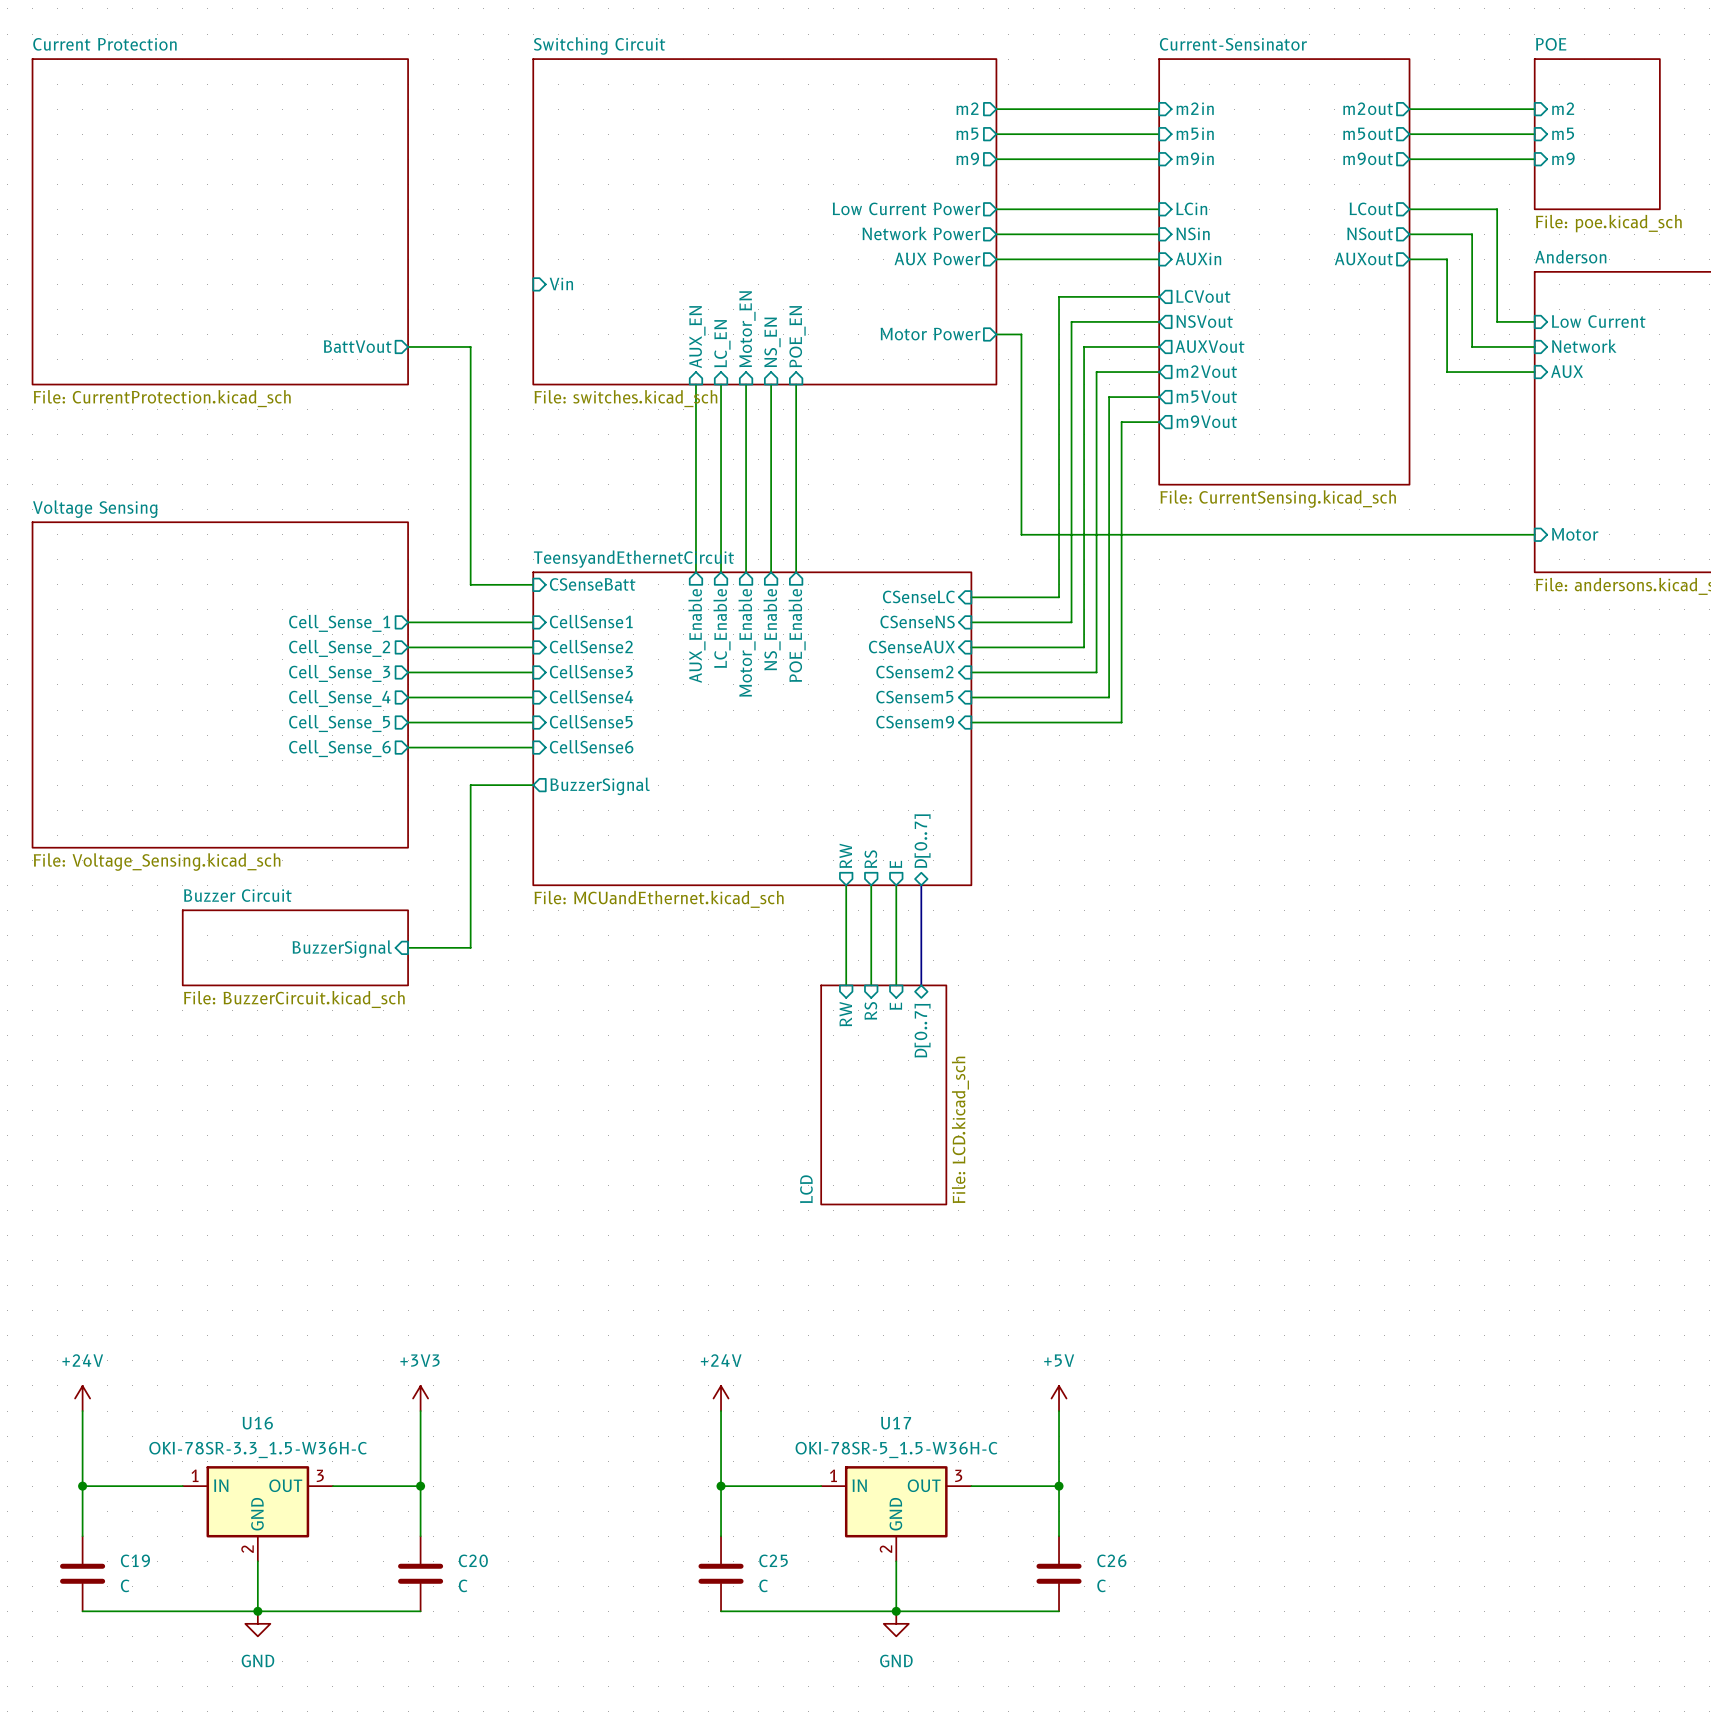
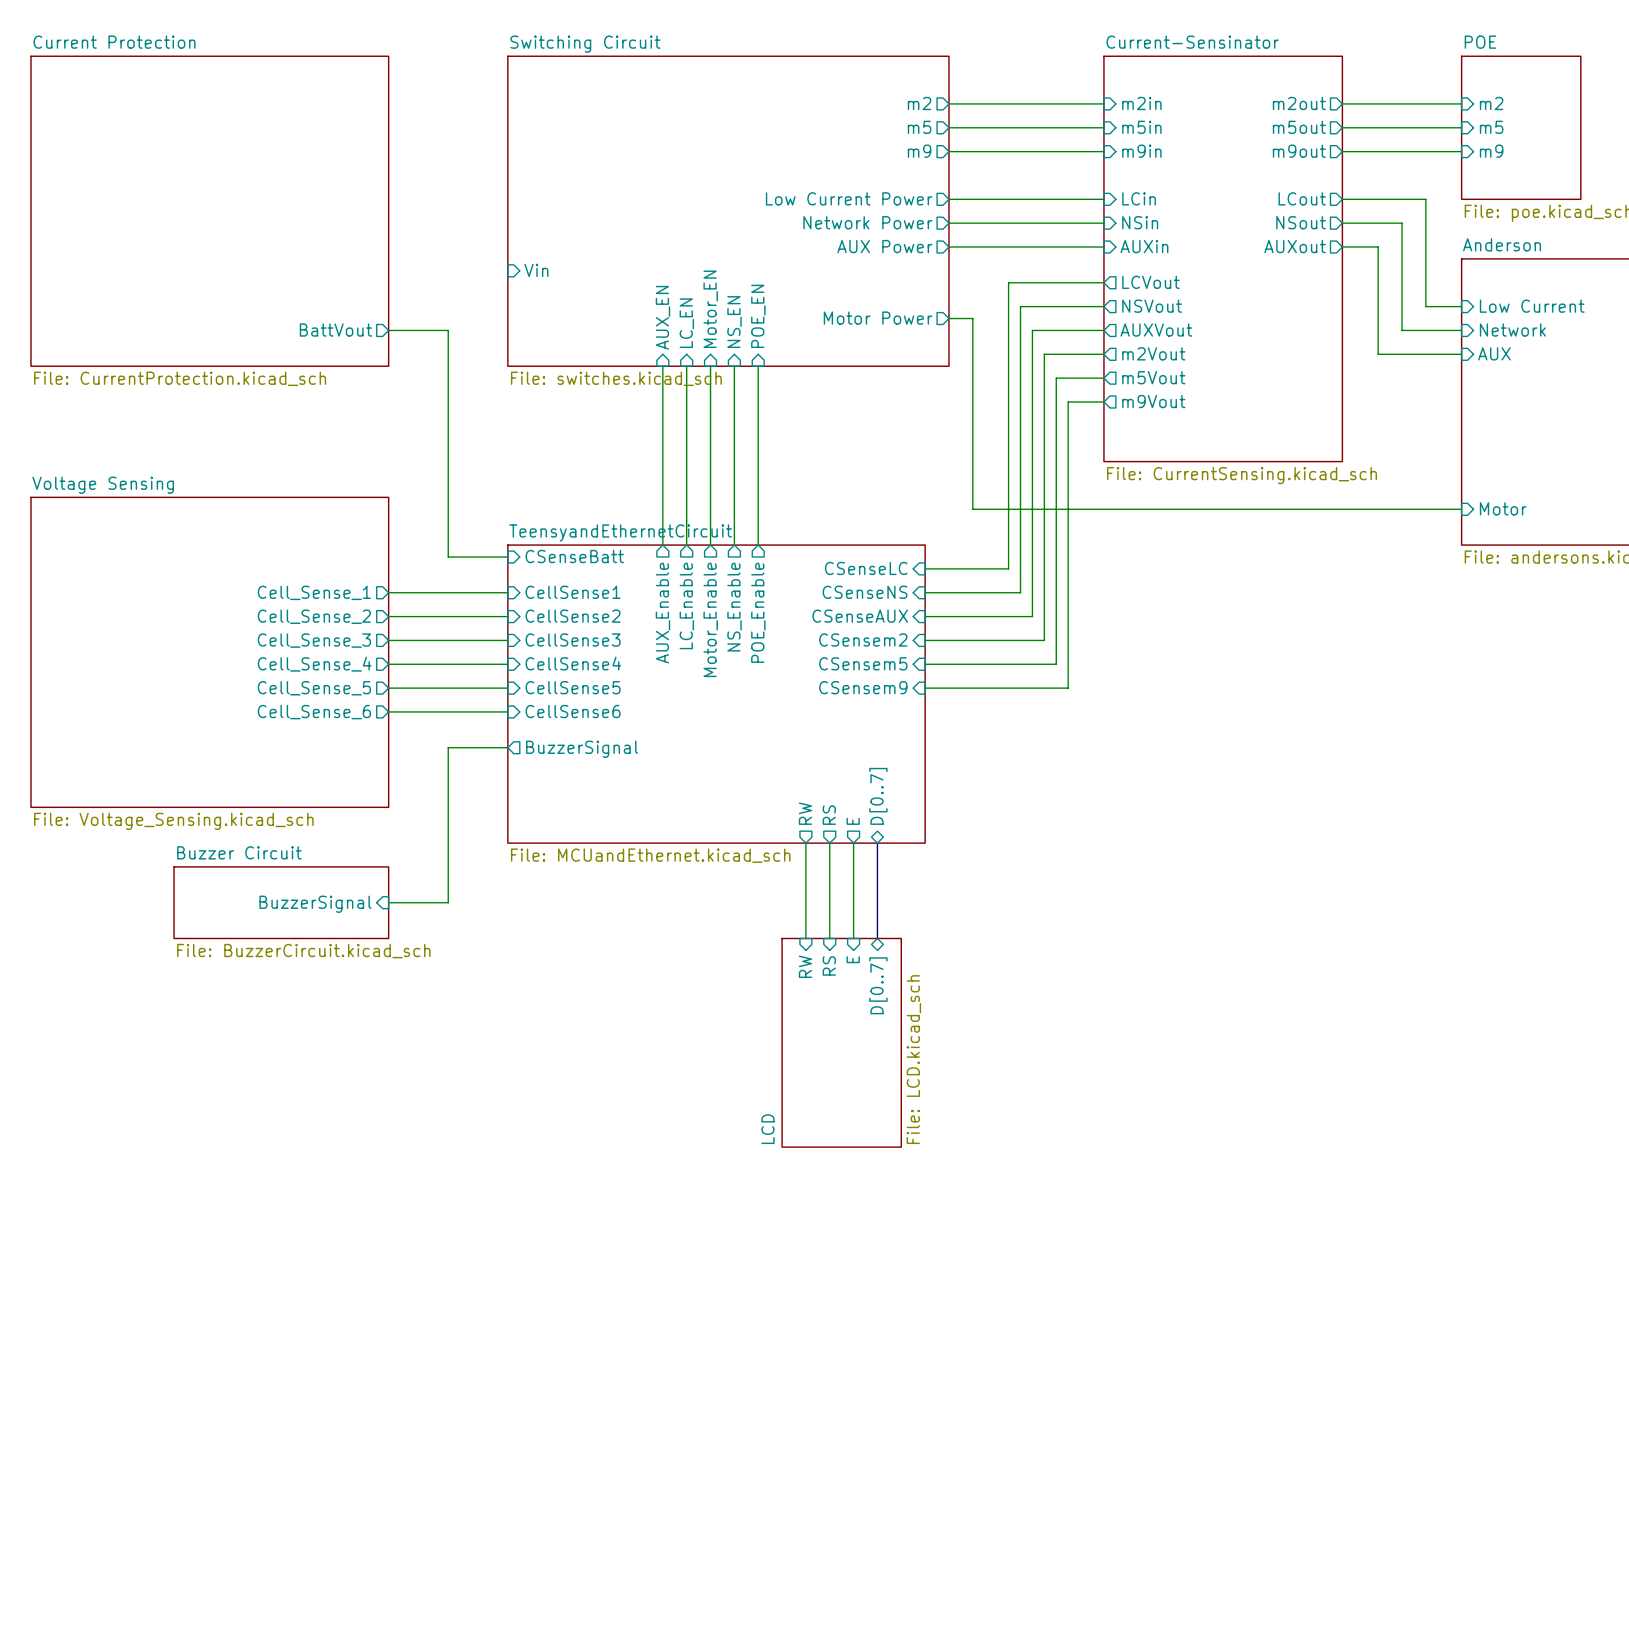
power symbol: +24V (82, 1398) -> none
power symbol: +3V3 (420, 1398) -> none
power symbol: +24V (721, 1398) -> none
power symbol: +5V (1059, 1398) -> none
wire: (82, 1411) (82, 1536) -> none
wire: (420, 1411) (420, 1536) -> none
wire: (721, 1411) (721, 1536) -> none
wire: (1059, 1411) (1059, 1536) -> none
wire: (82, 1486) (182, 1486) -> none
junction: (82, 1486) -> none
wire: (332, 1486) (420, 1486) -> none
junction: (420, 1486) -> none
wire: (721, 1486) (821, 1486) -> none
junction: (721, 1486) -> none
wire: (971, 1486) (1059, 1486) -> none
junction: (1059, 1486) -> none
U16: OKI-78SR-3.3_1.5-W36H-C (257, 1513) -> none
U17: OKI-78SR-5_1.5-W36H-C (896, 1513) -> none
wire: (257, 1561) (257, 1611) -> none
wire: (896, 1561) (896, 1611) -> none
C19: C (82, 1573) -> none
C20: C (420, 1573) -> none
C25: C (721, 1573) -> none
C26: C (1059, 1573) -> none
wire: (82, 1611) (420, 1611) -> none
junction: (257, 1611) -> none
wire: (721, 1611) (1059, 1611) -> none
junction: (896, 1611) -> none
power symbol: GND (257, 1623) -> none
power symbol: GND (896, 1623) -> none

